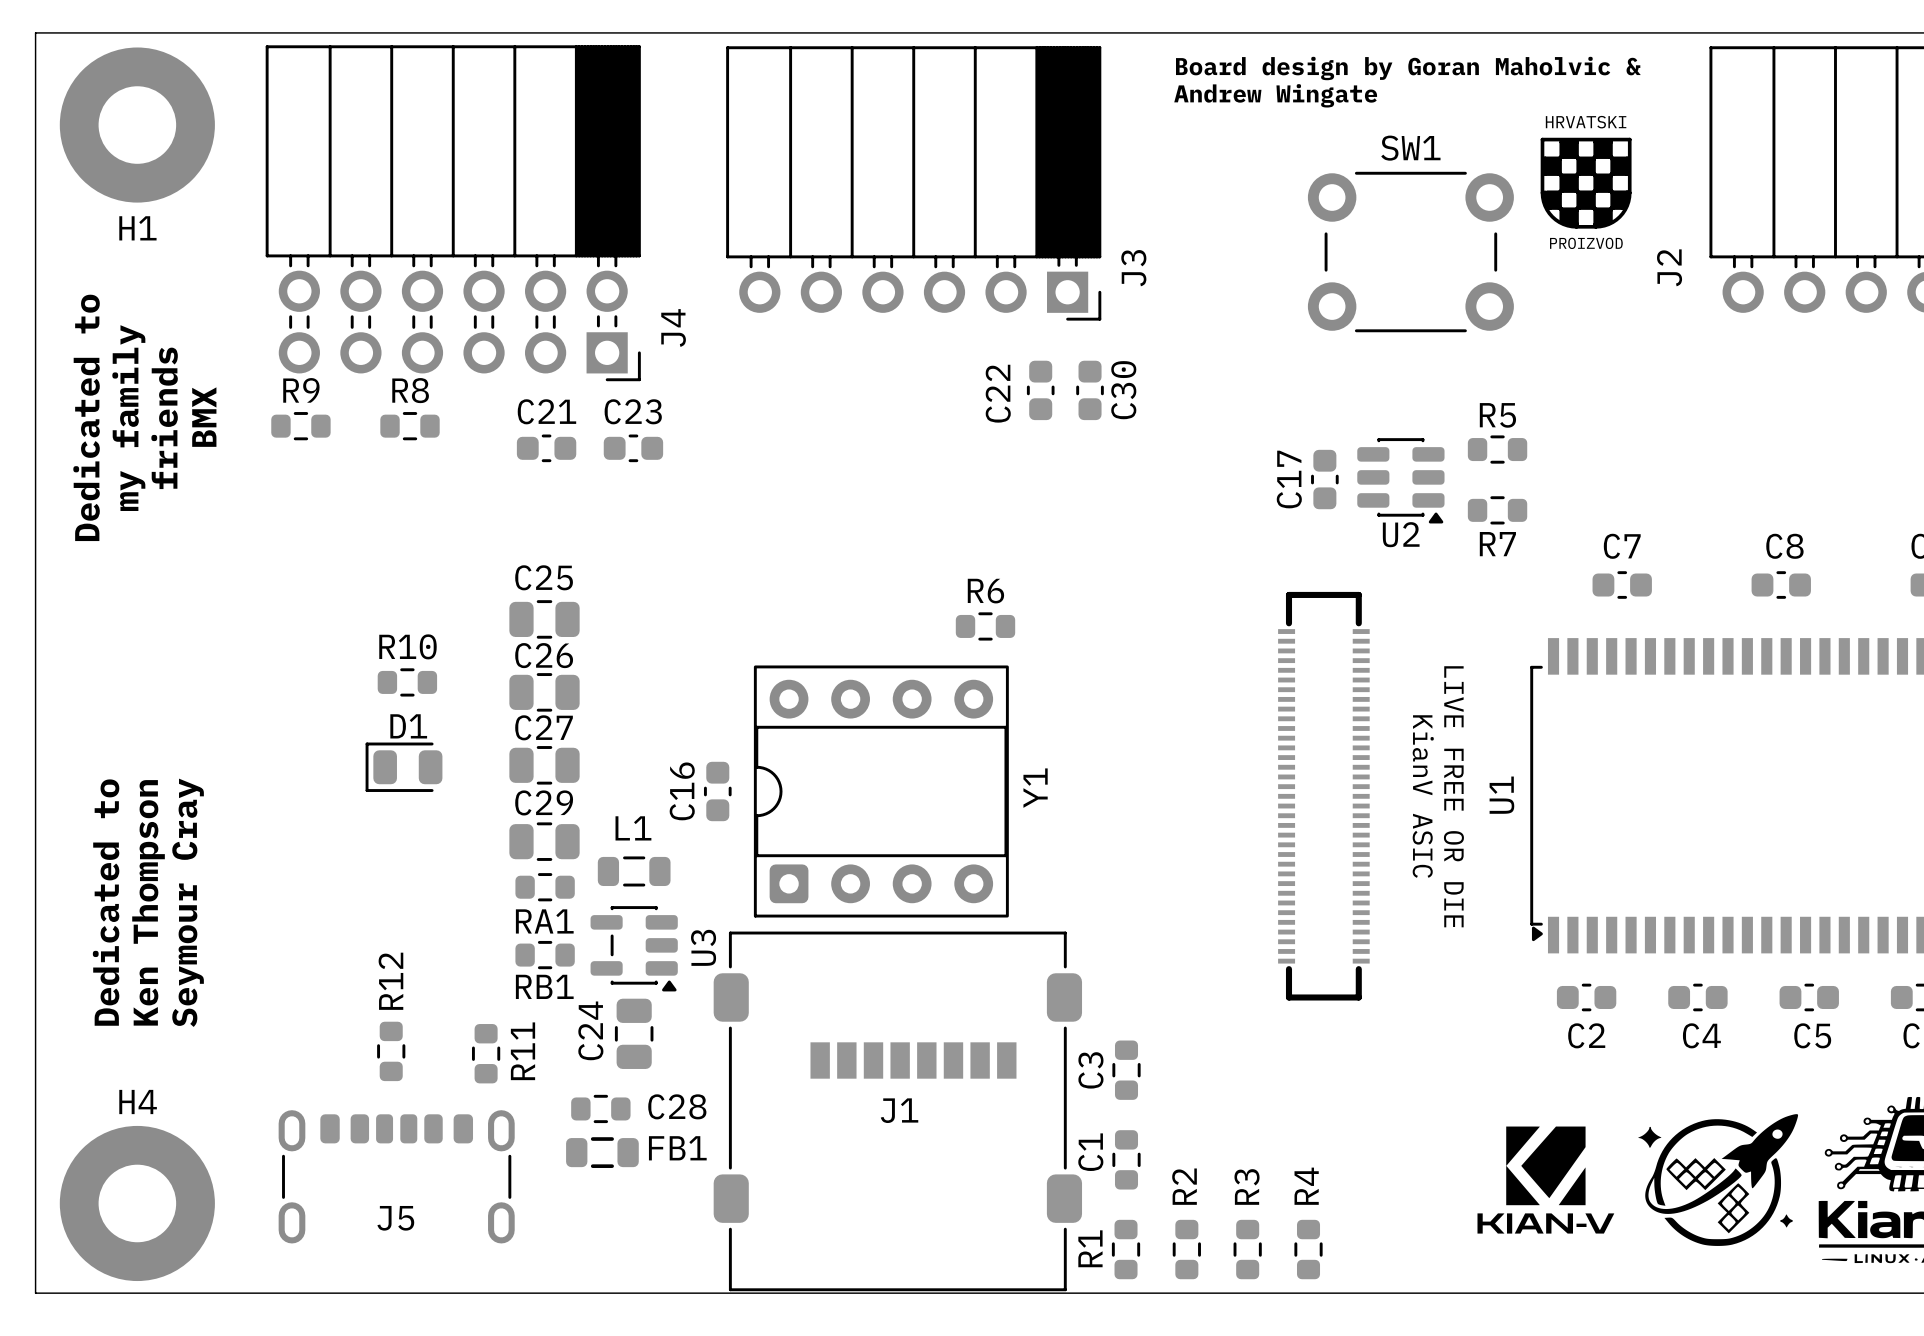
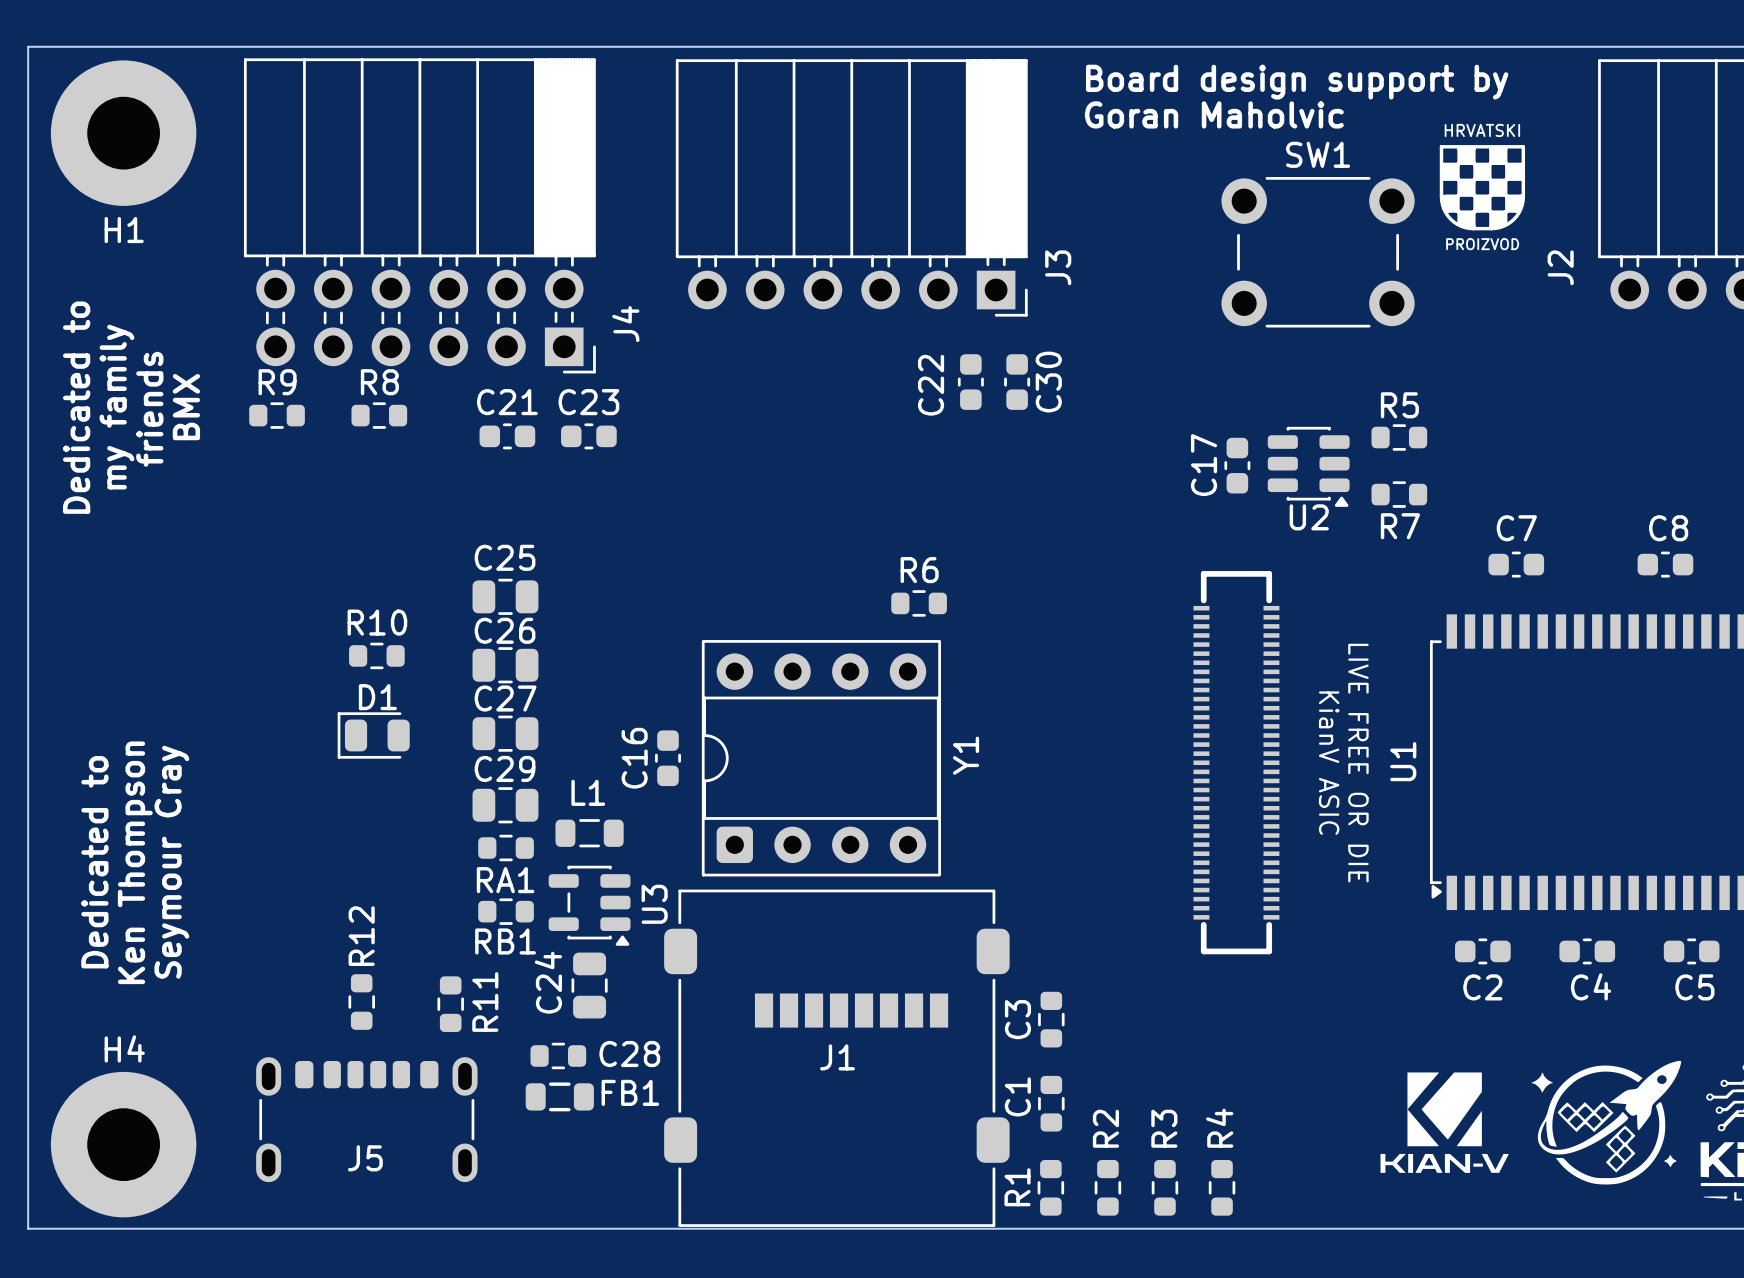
text: Board design by Goran Maholvic & (1408, 68) -> Goran Maholvic (1214, 114)
text: none -> Board design support by (1297, 82)
text: Andrew Wingate (1275, 95) -> none

